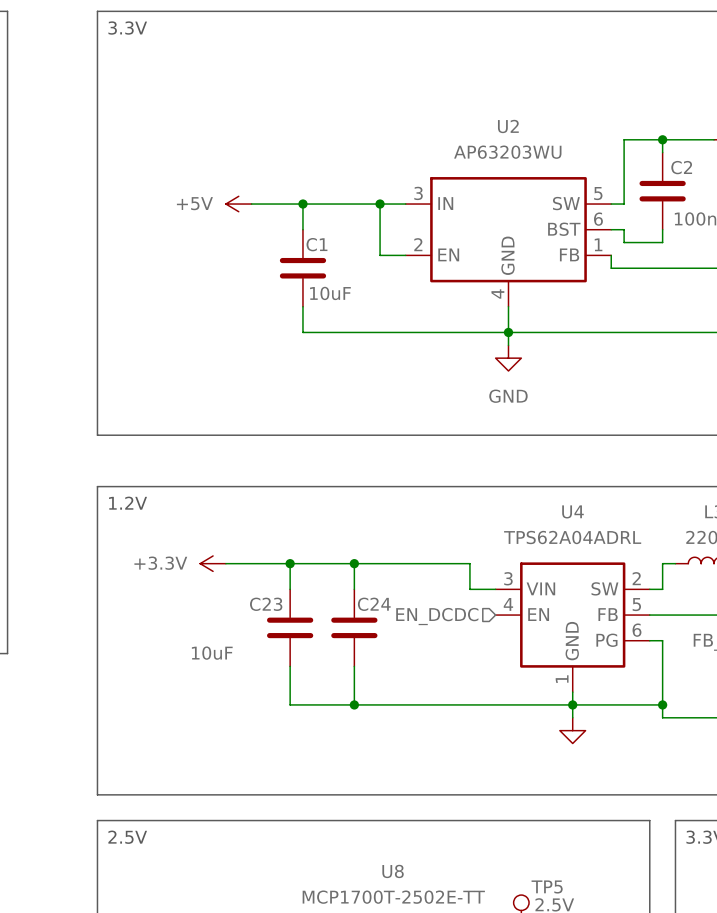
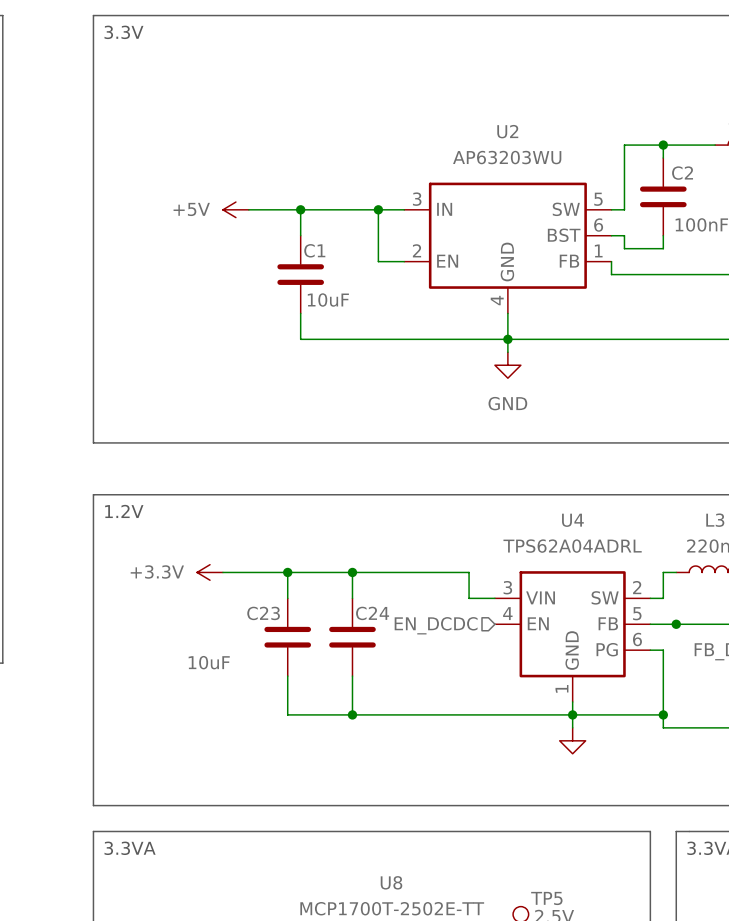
junction: none -> (676, 624)
text: 2.5V (127, 837) -> 3.3VA (130, 848)

